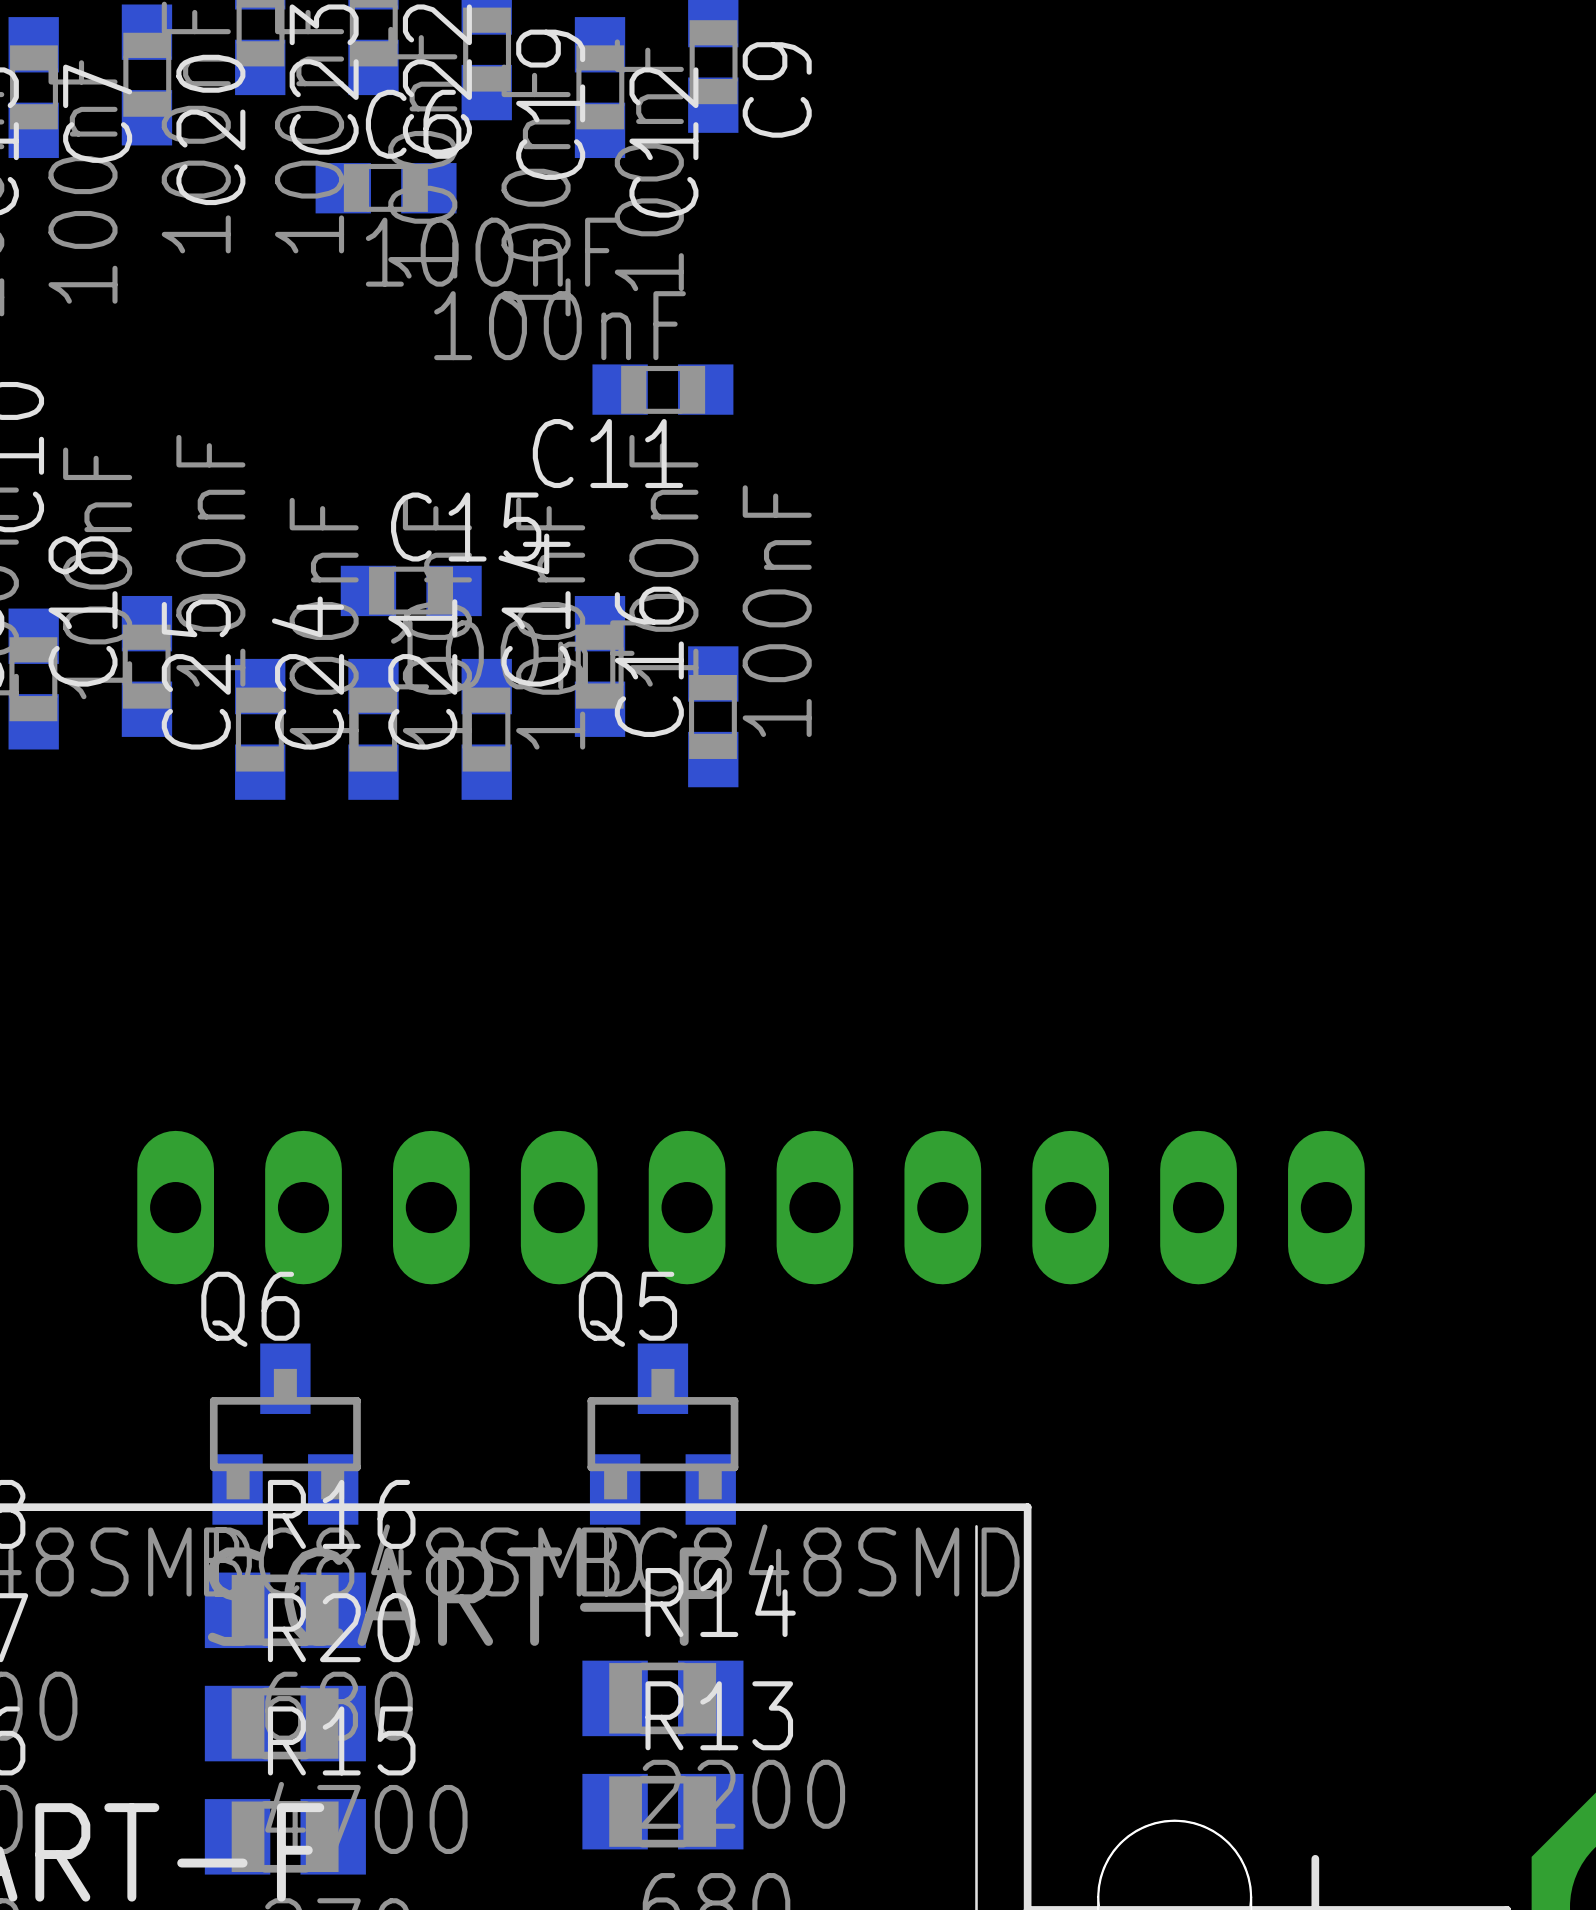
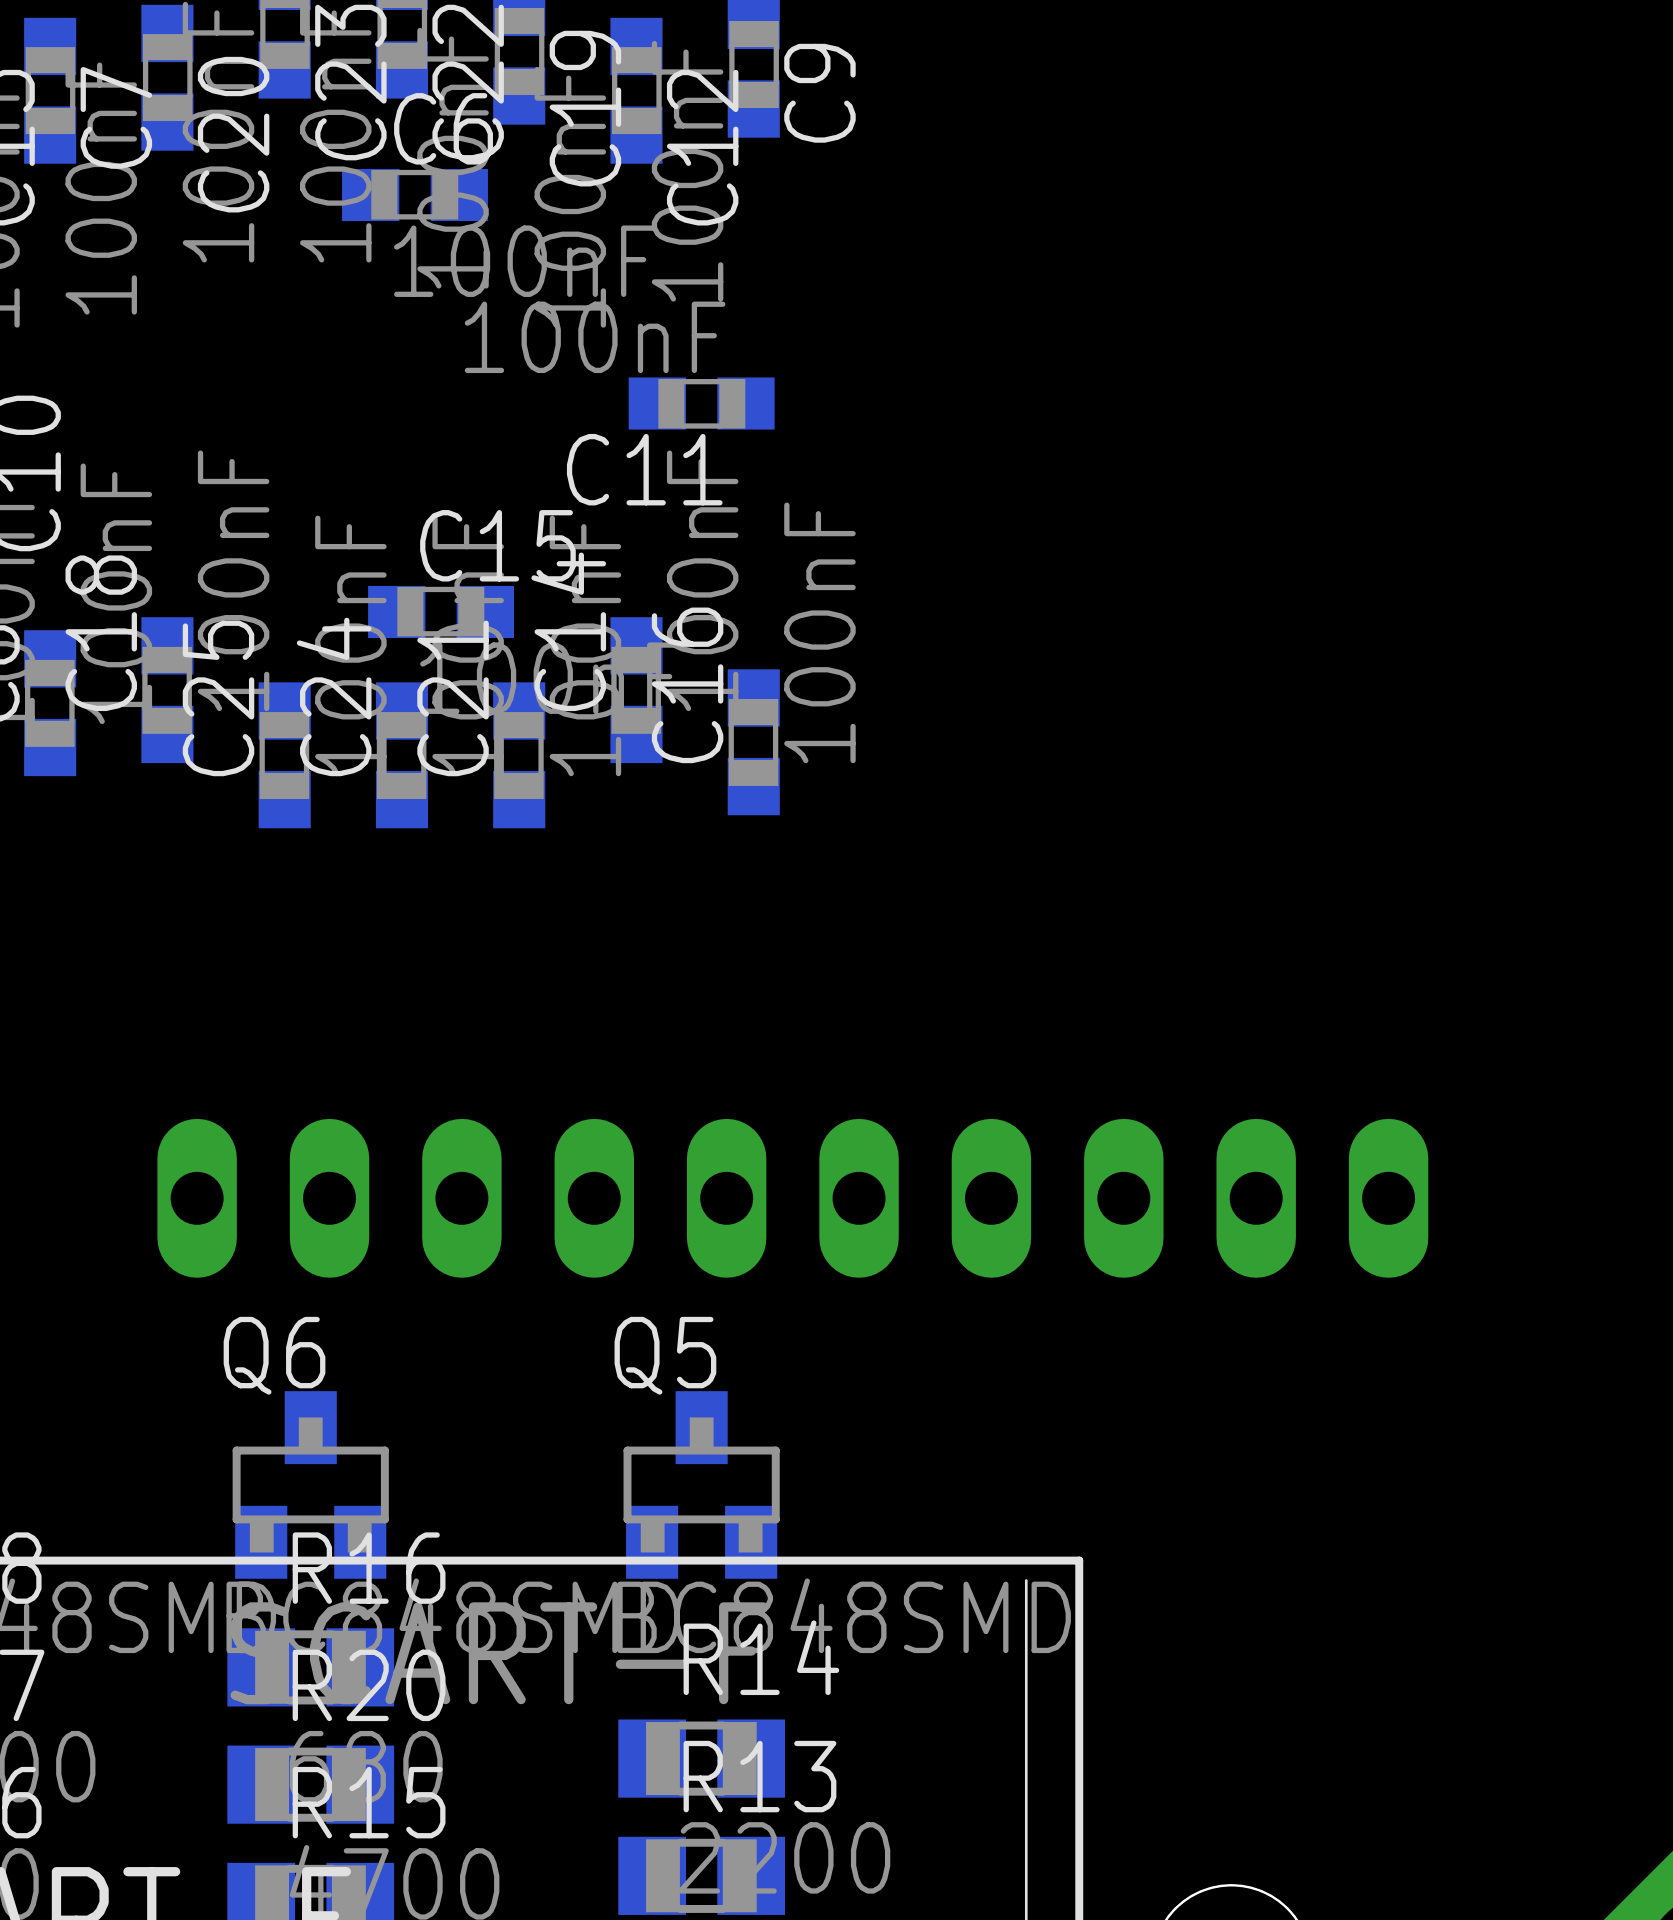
part position: (751, 1207) -> (792, 1198)

